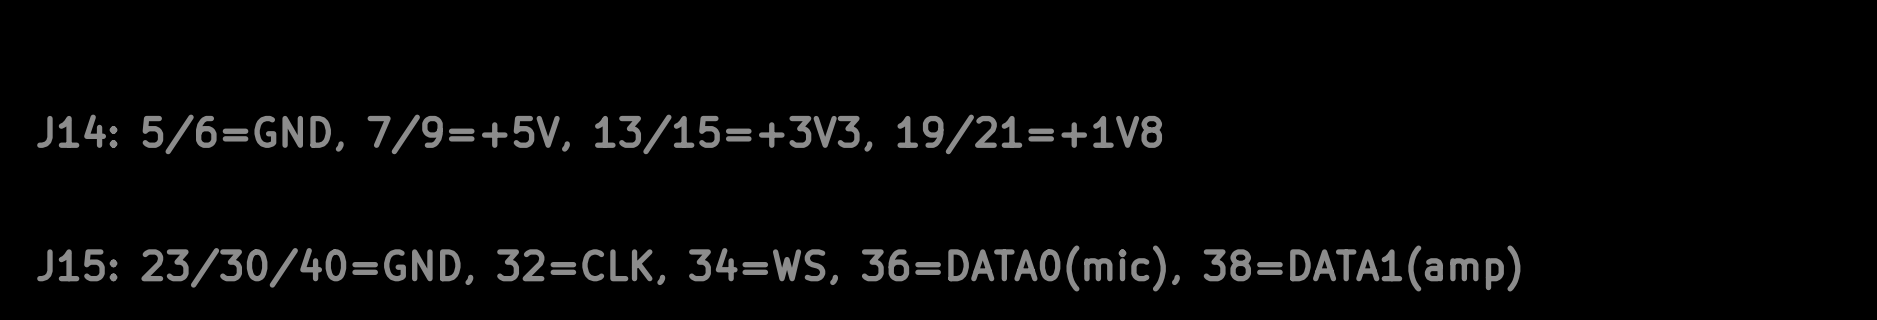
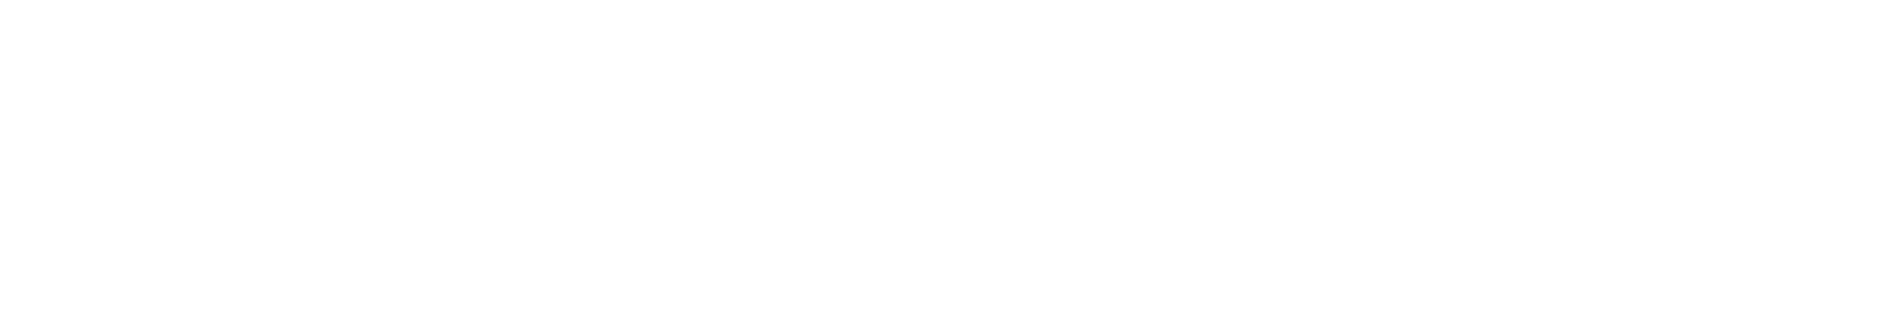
text: J14: 5/6=GND, 7/9=+5V, 13/15=+3V3, 19/21=+1V8 (599, 134) -> none
text: J15: 23/30/40=GND, 32=CLK, 34=WS, 36=DATA0(mic), 38=DATA1(amp) (778, 268) -> none

